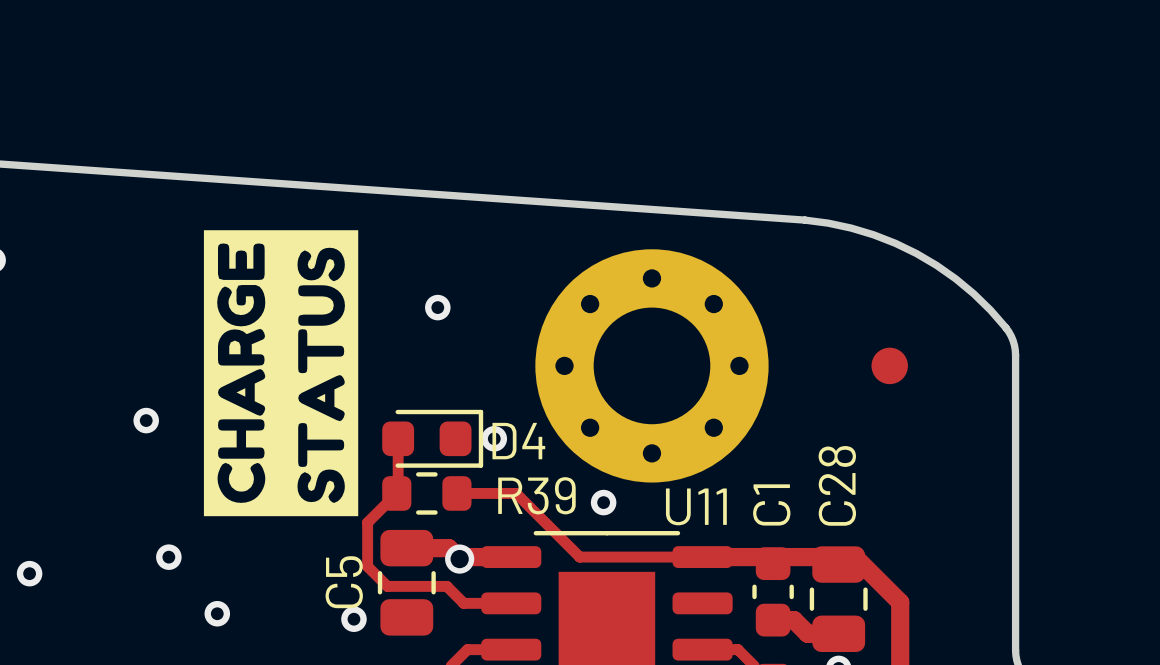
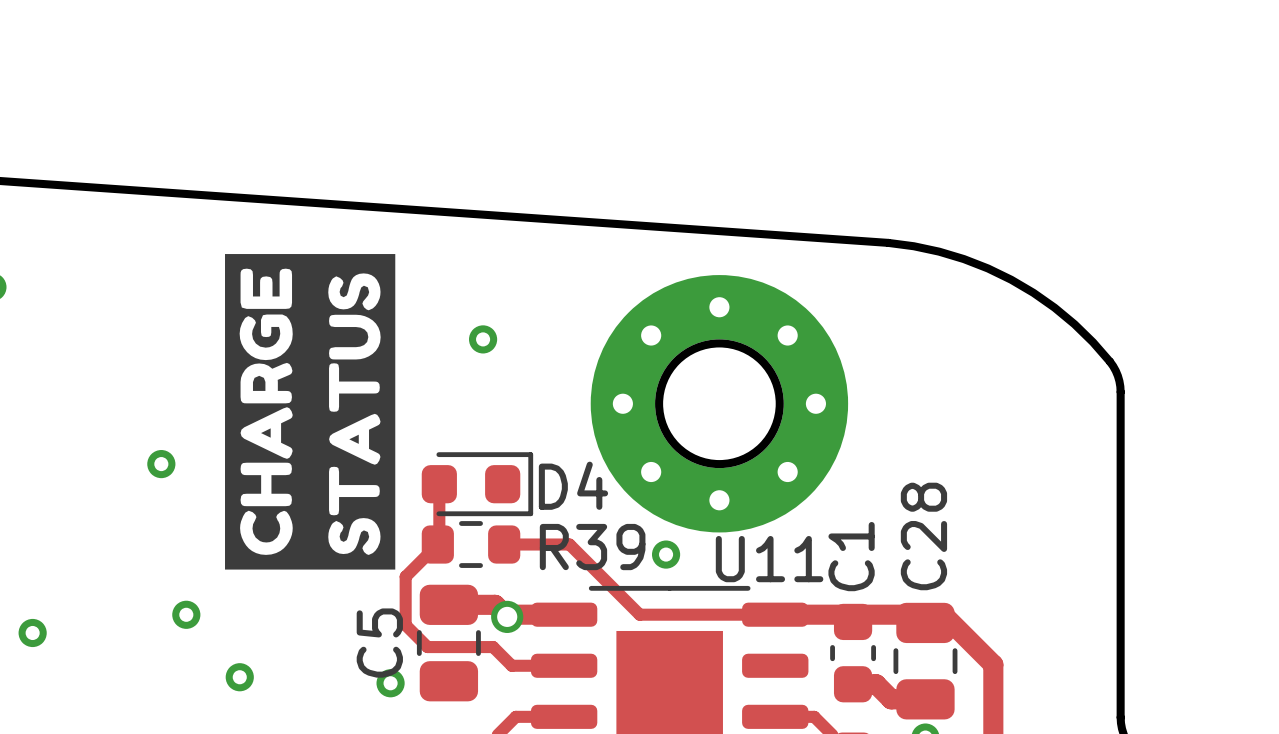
round board edge: none -> [655, 339, 784, 469]
part: (889, 365) -> none
via: (494, 438) -> none

